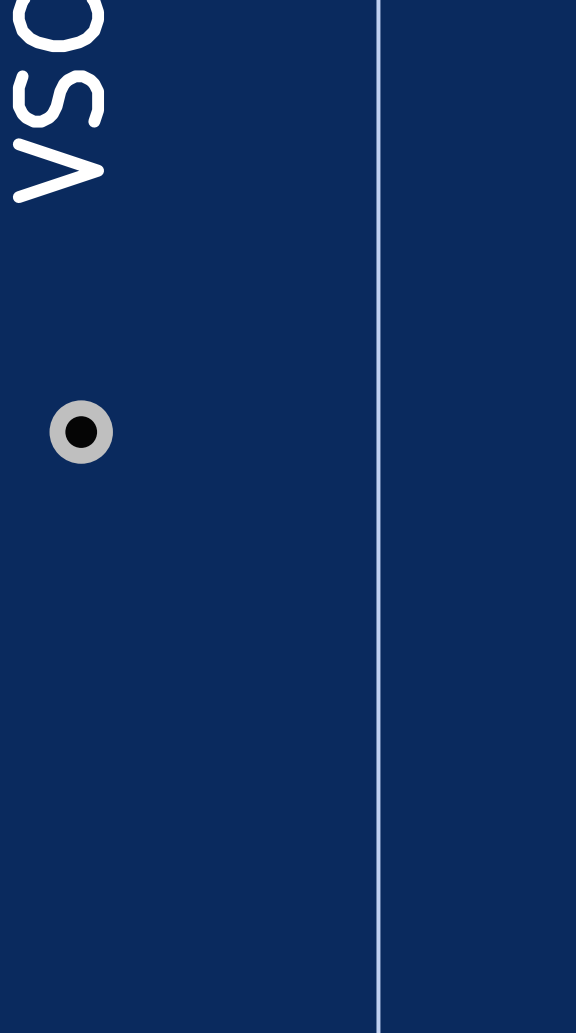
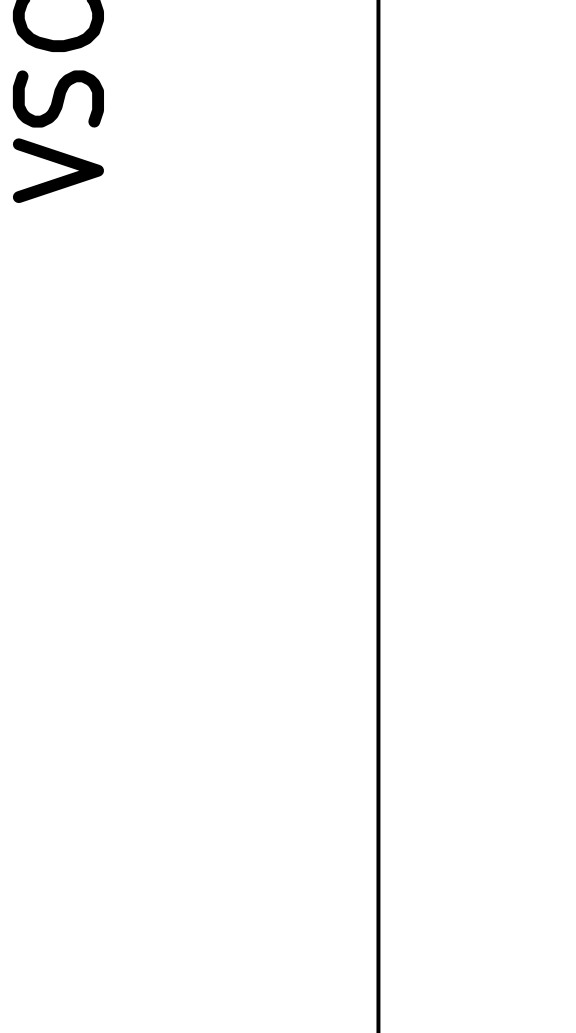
via: (81, 432) -> none

